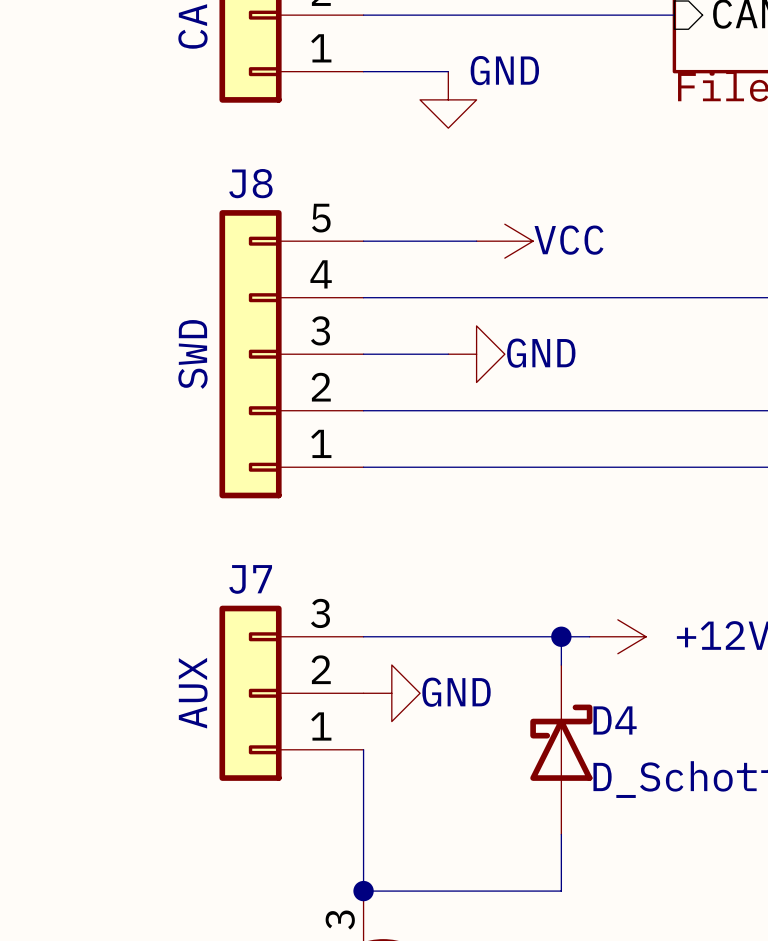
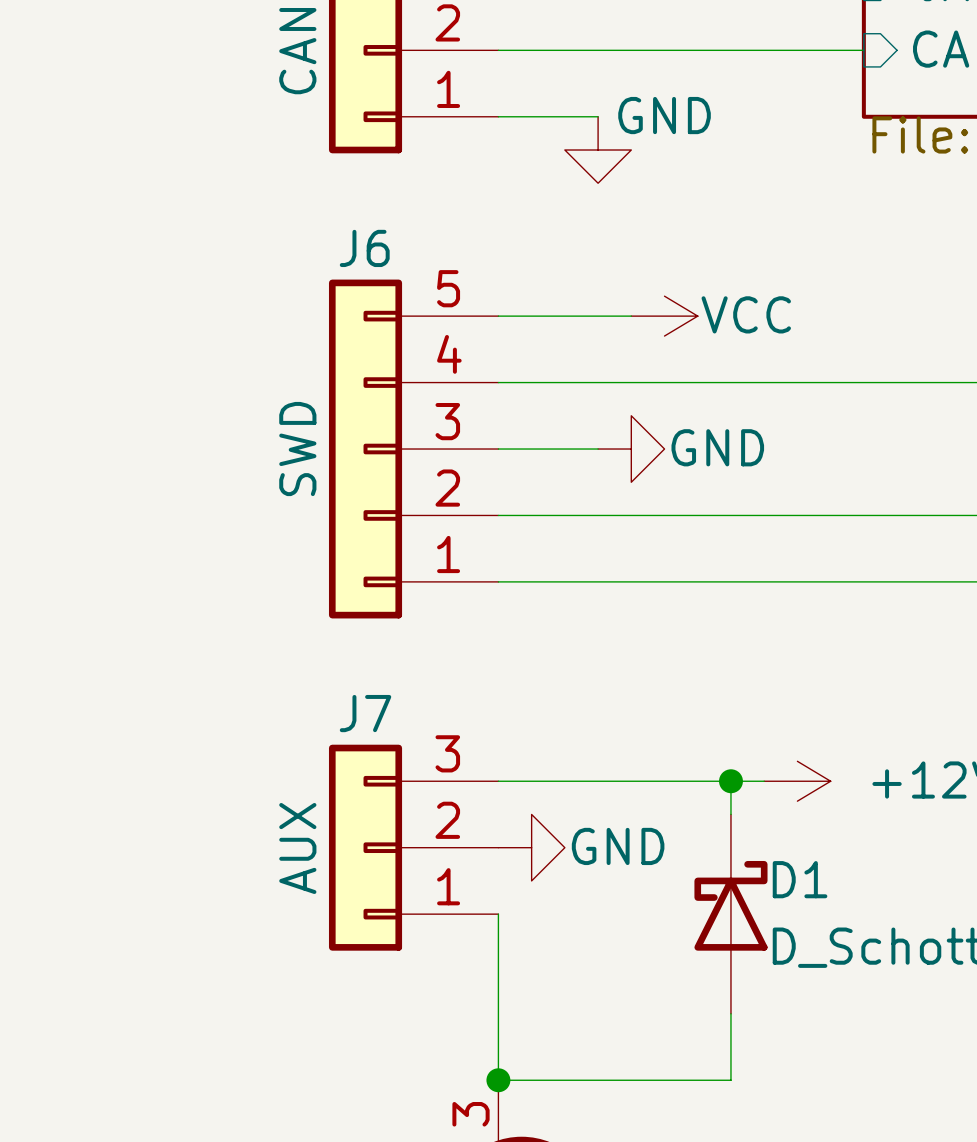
J8 name: J8 (250, 183) -> J6 (364, 248)
D4 name: D4 (615, 720) -> D1 (800, 879)

